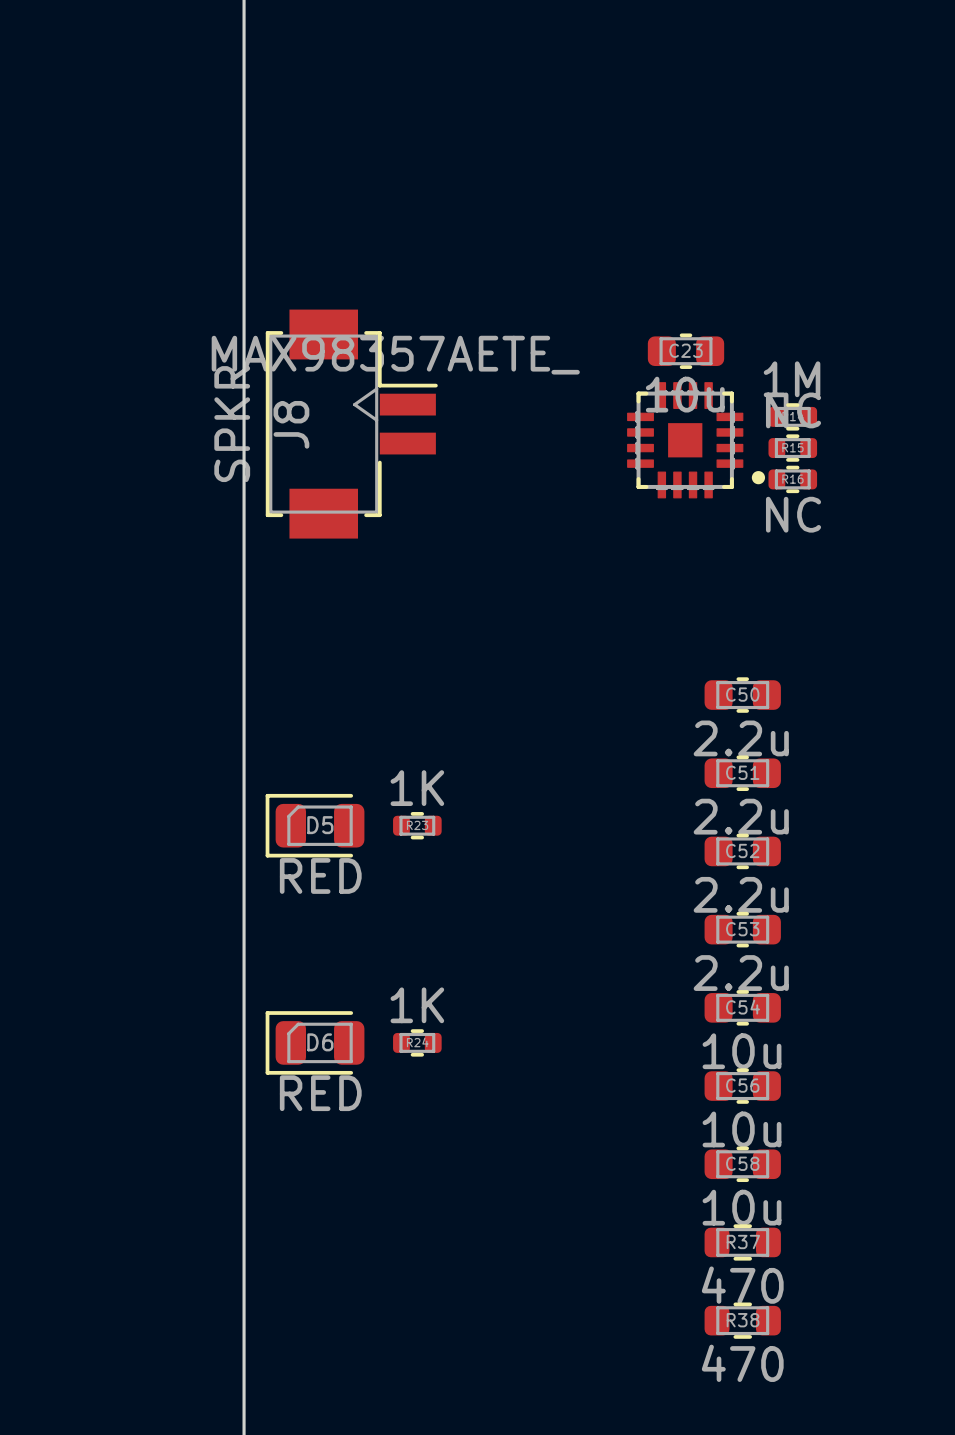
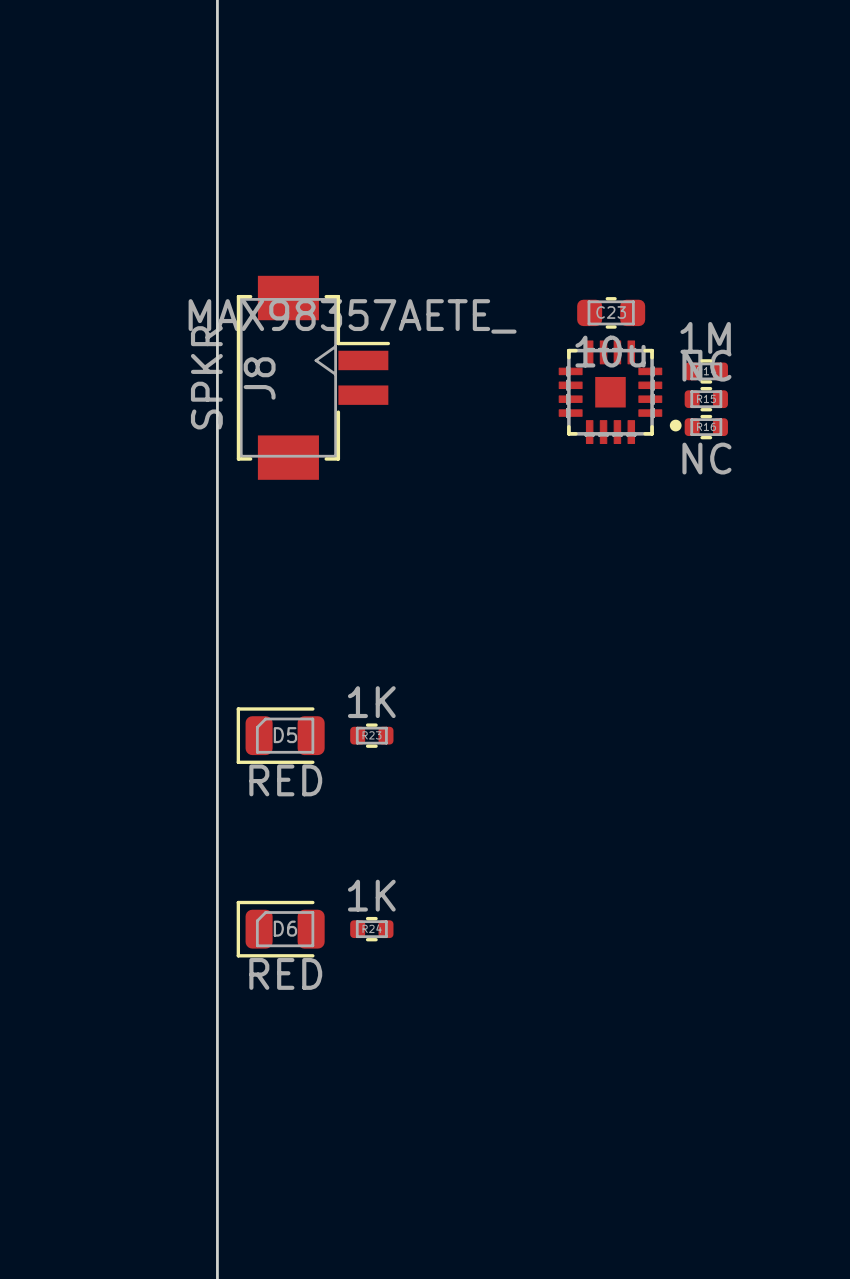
C50: 2.2u (742, 695) -> none
C51: 2.2u (742, 773) -> none
C52: 2.2u (742, 851) -> none
C53: 2.2u (742, 929) -> none
C54: 10u (742, 1007) -> none
C56: 10u (742, 1086) -> none
C58: 10u (742, 1164) -> none
R37: 470 (742, 1242) -> none
R38: 470 (742, 1320) -> none

